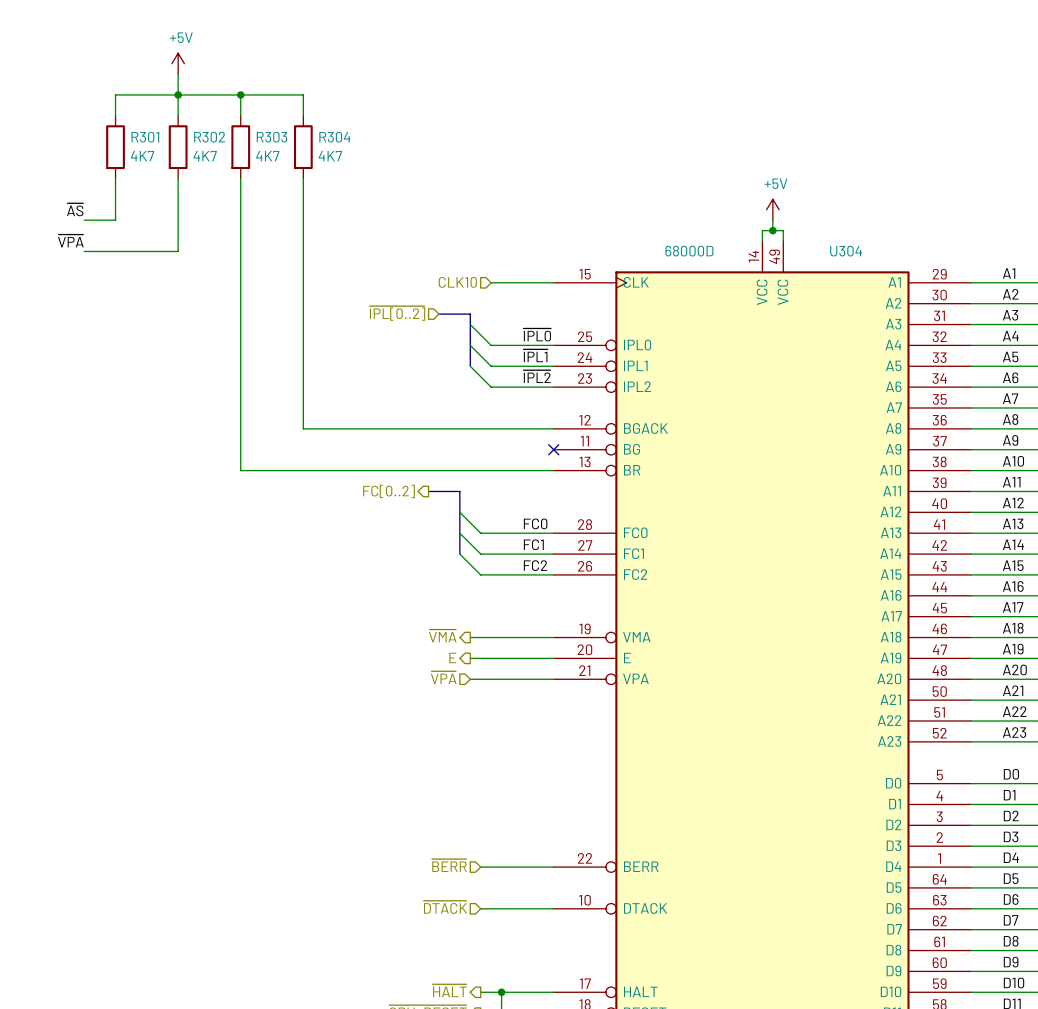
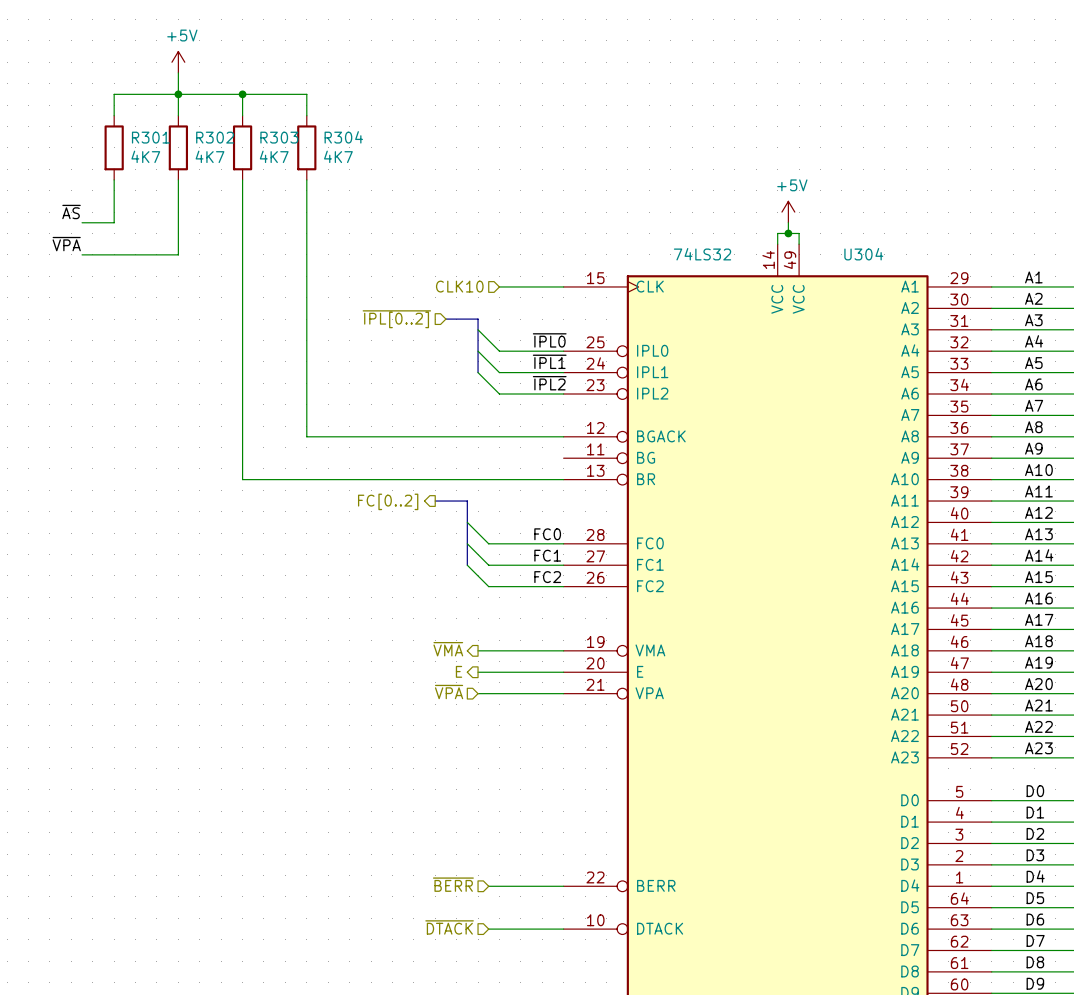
U304 value: 68000D (689, 251) -> 74LS32 (702, 254)
no-connect mark: (553, 449) -> none

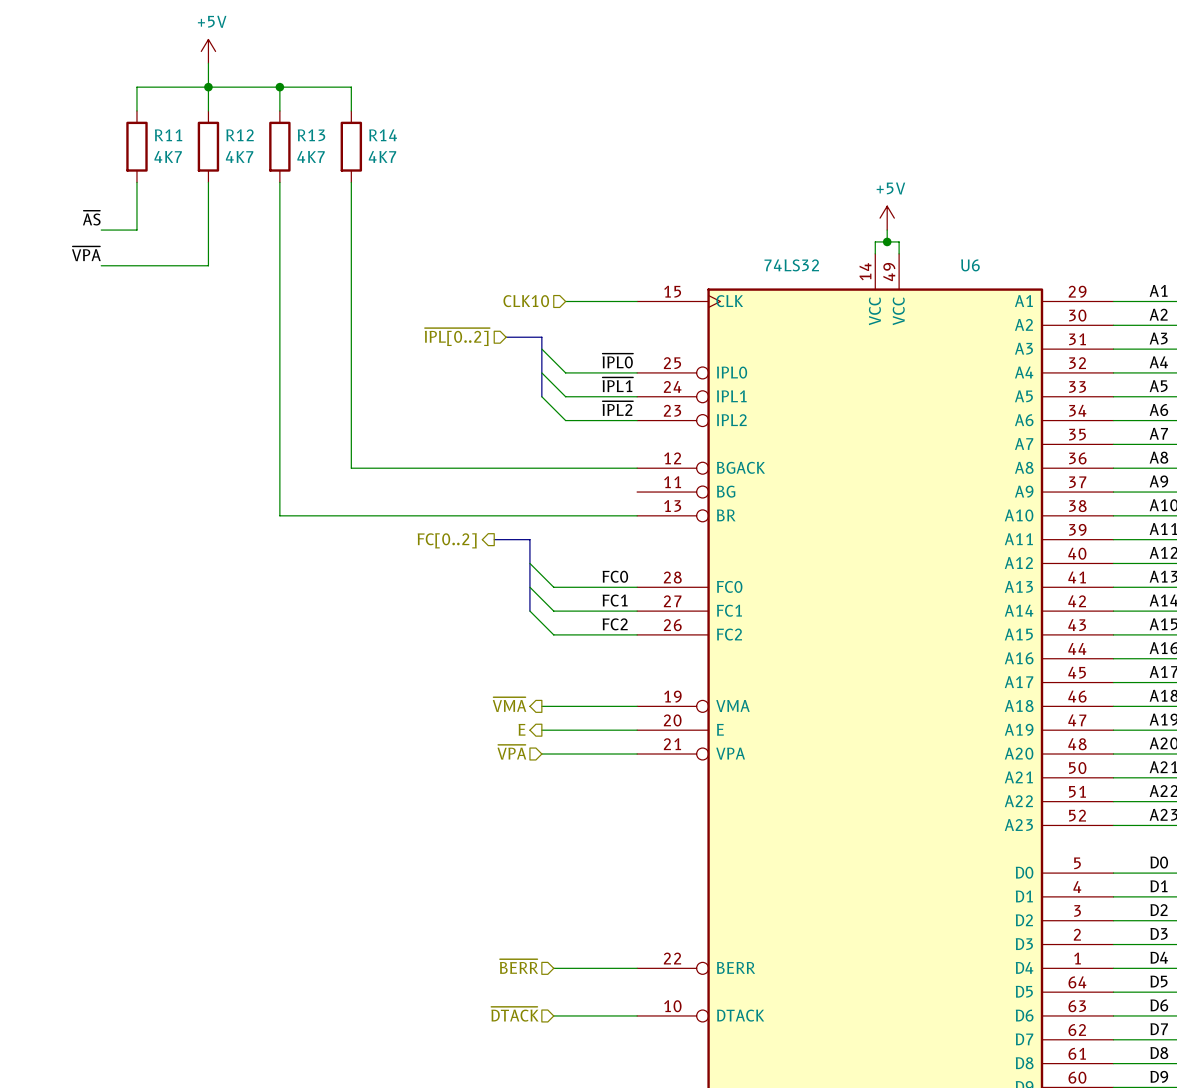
R301 name: R301 (150, 137) -> R11 (168, 135)
R302 name: R302 (215, 137) -> R12 (240, 135)
R303 name: R303 (279, 137) -> R13 (311, 135)
R304 name: R304 (343, 137) -> R14 (383, 135)
U304 name: U304 (863, 254) -> U6 (970, 265)

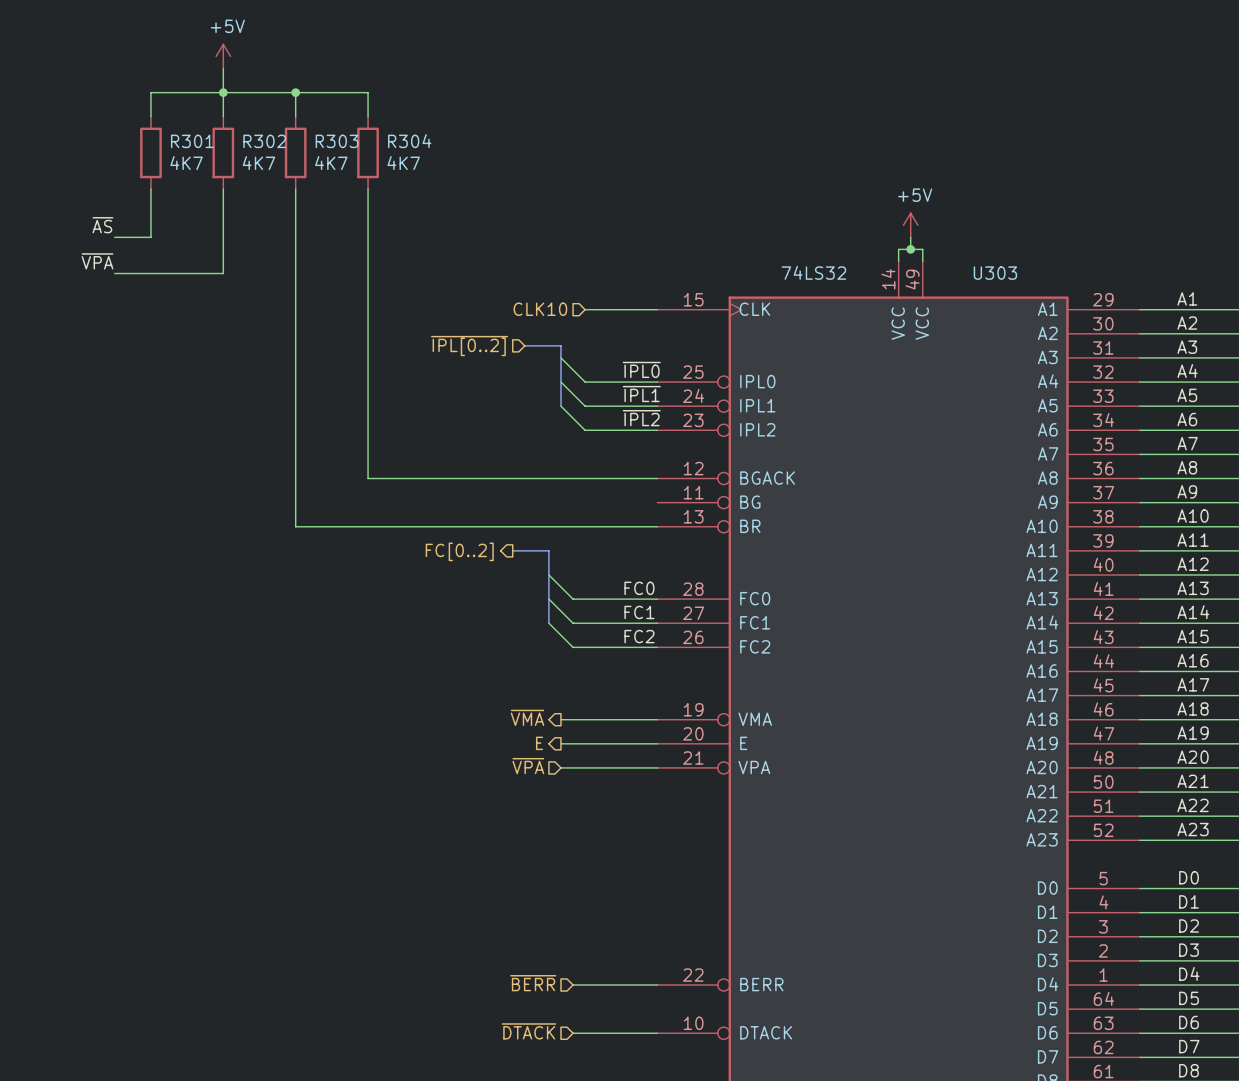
R11 name: R11 (168, 135) -> R301 (192, 141)
R12 name: R12 (240, 135) -> R302 (264, 141)
R13 name: R13 (311, 135) -> R303 (337, 141)
R14 name: R14 (383, 135) -> R304 (409, 141)
U6 name: U6 (970, 265) -> U303 (995, 273)

